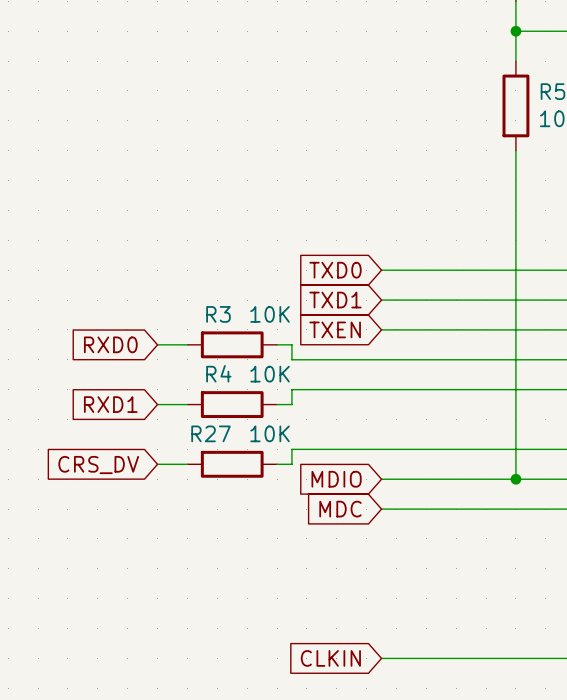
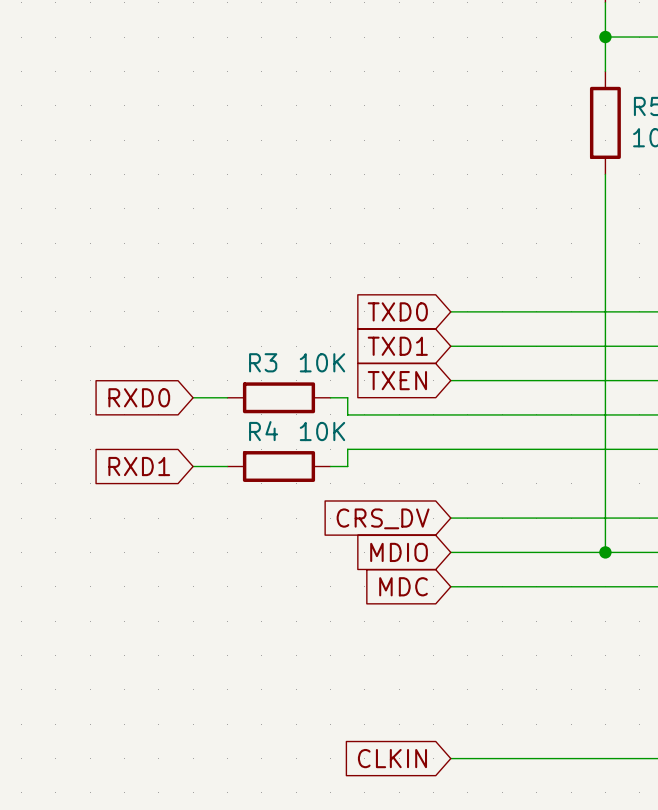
wire: (381, 449) (291, 449) (291, 464) (277, 464) -> none
wire: (157, 464) (187, 464) -> none
R27: 10K (232, 464) -> none
global label position: CRS_DV (98, 465) -> CRS_DV (383, 518)

